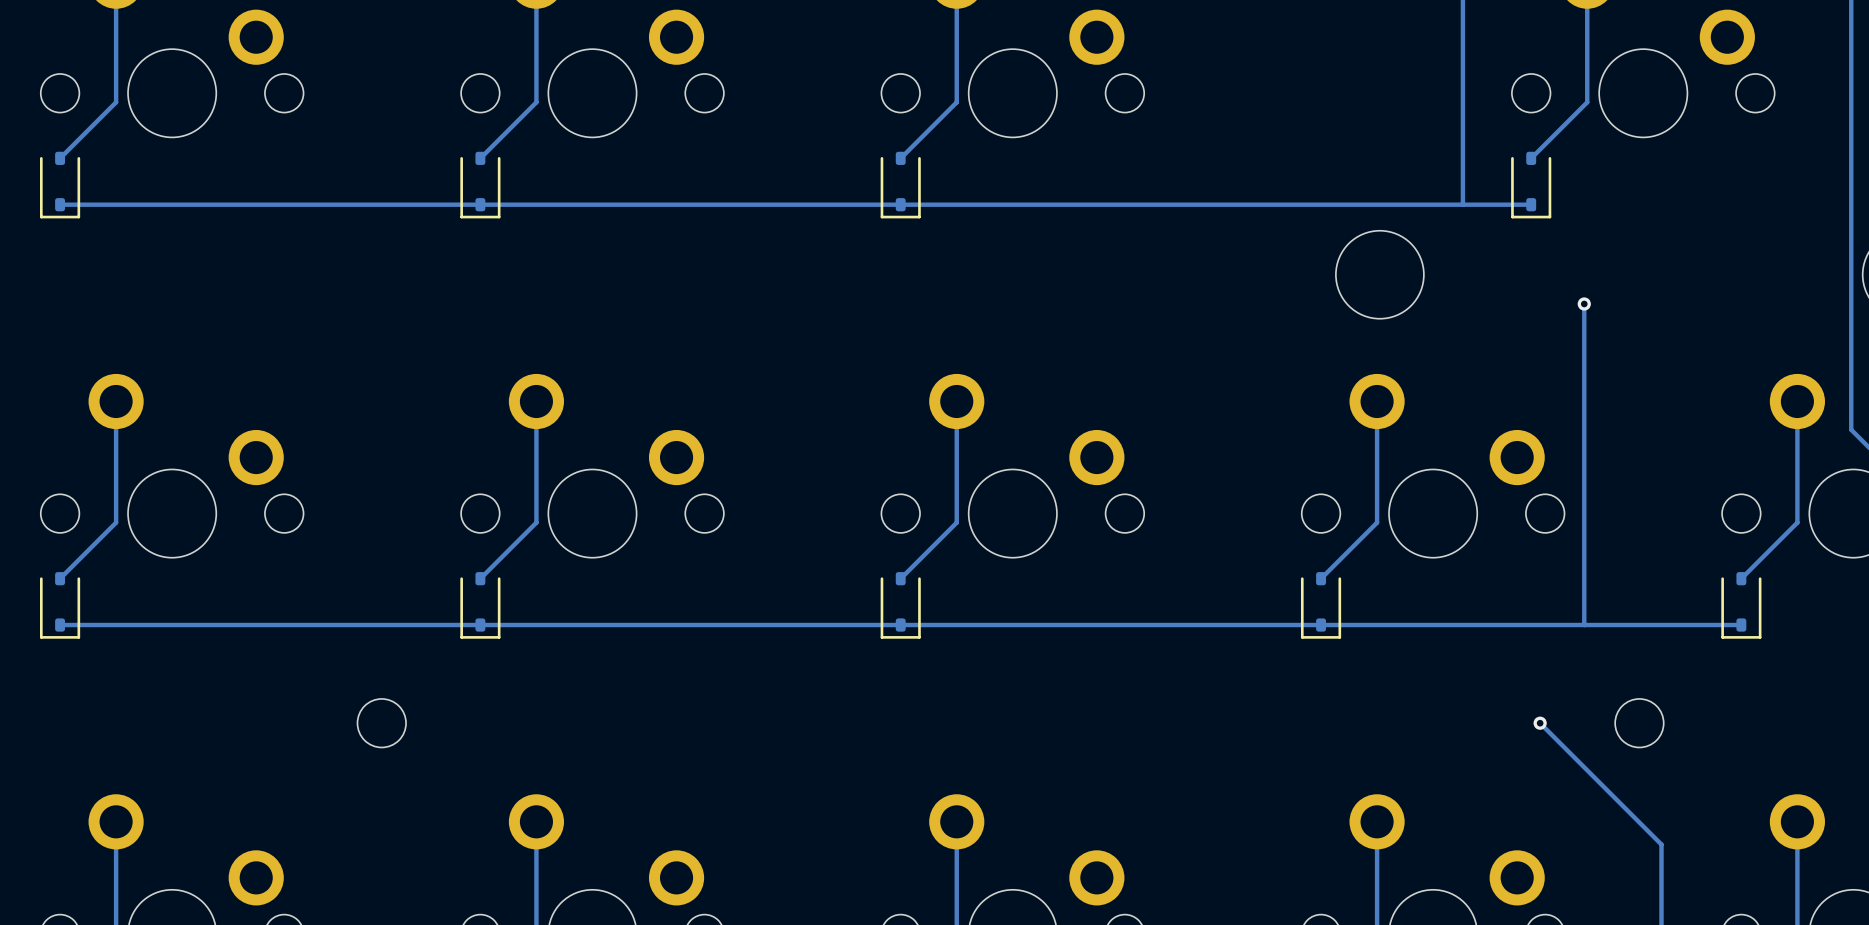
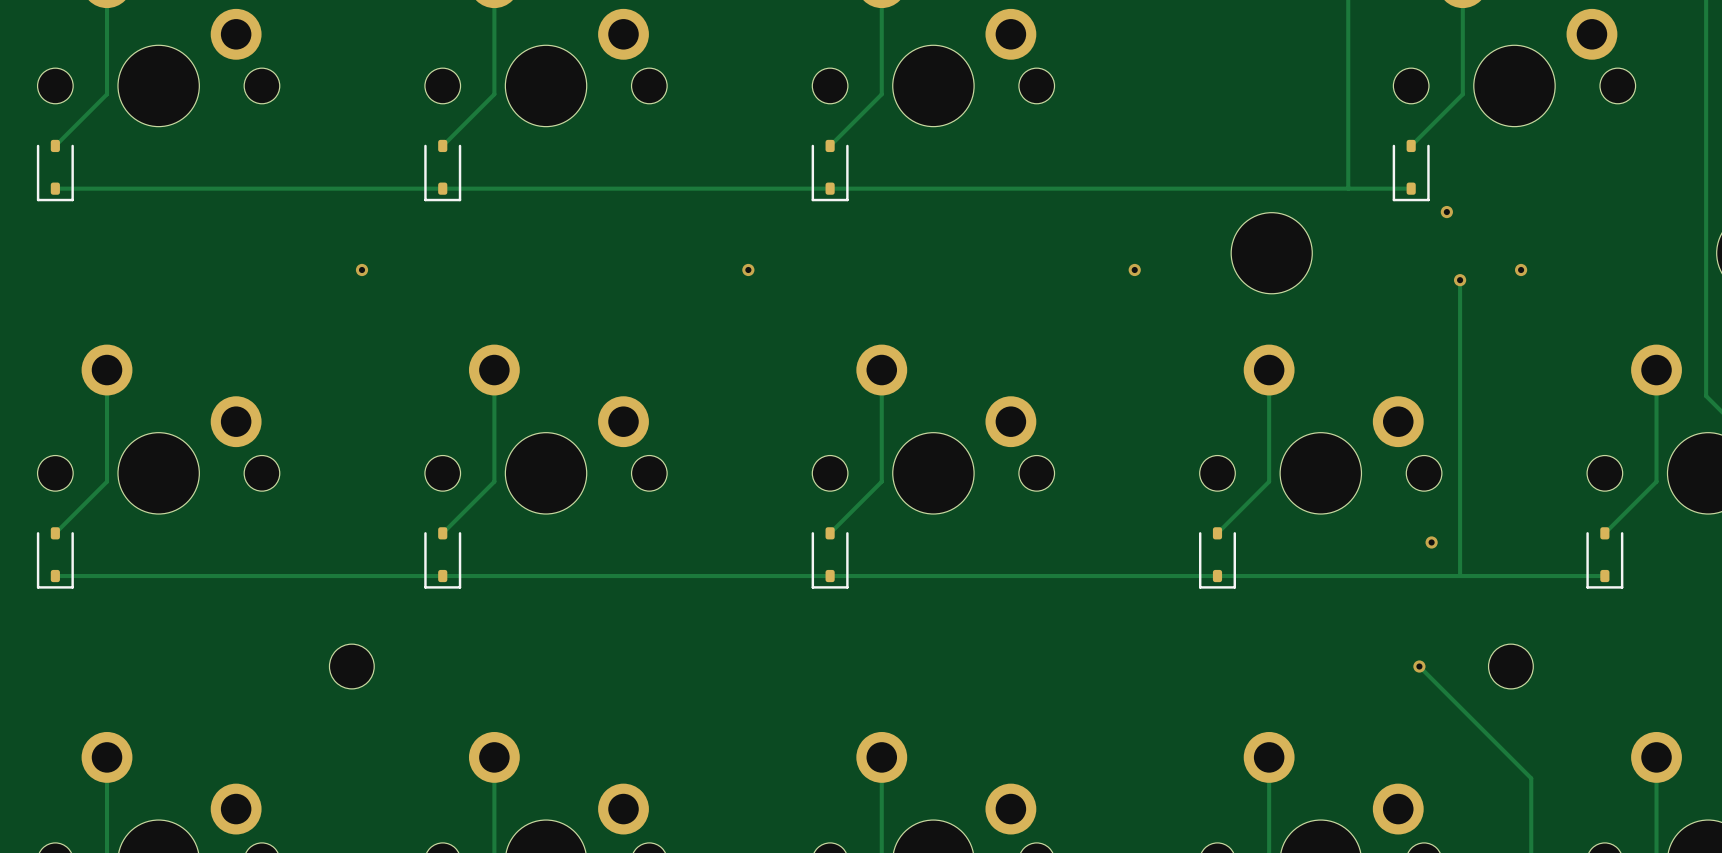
via: none -> (1446, 212)
via: none -> (362, 269)
via: none -> (748, 269)
via: none -> (1134, 269)
via: none -> (1521, 269)
via: none -> (1431, 542)

